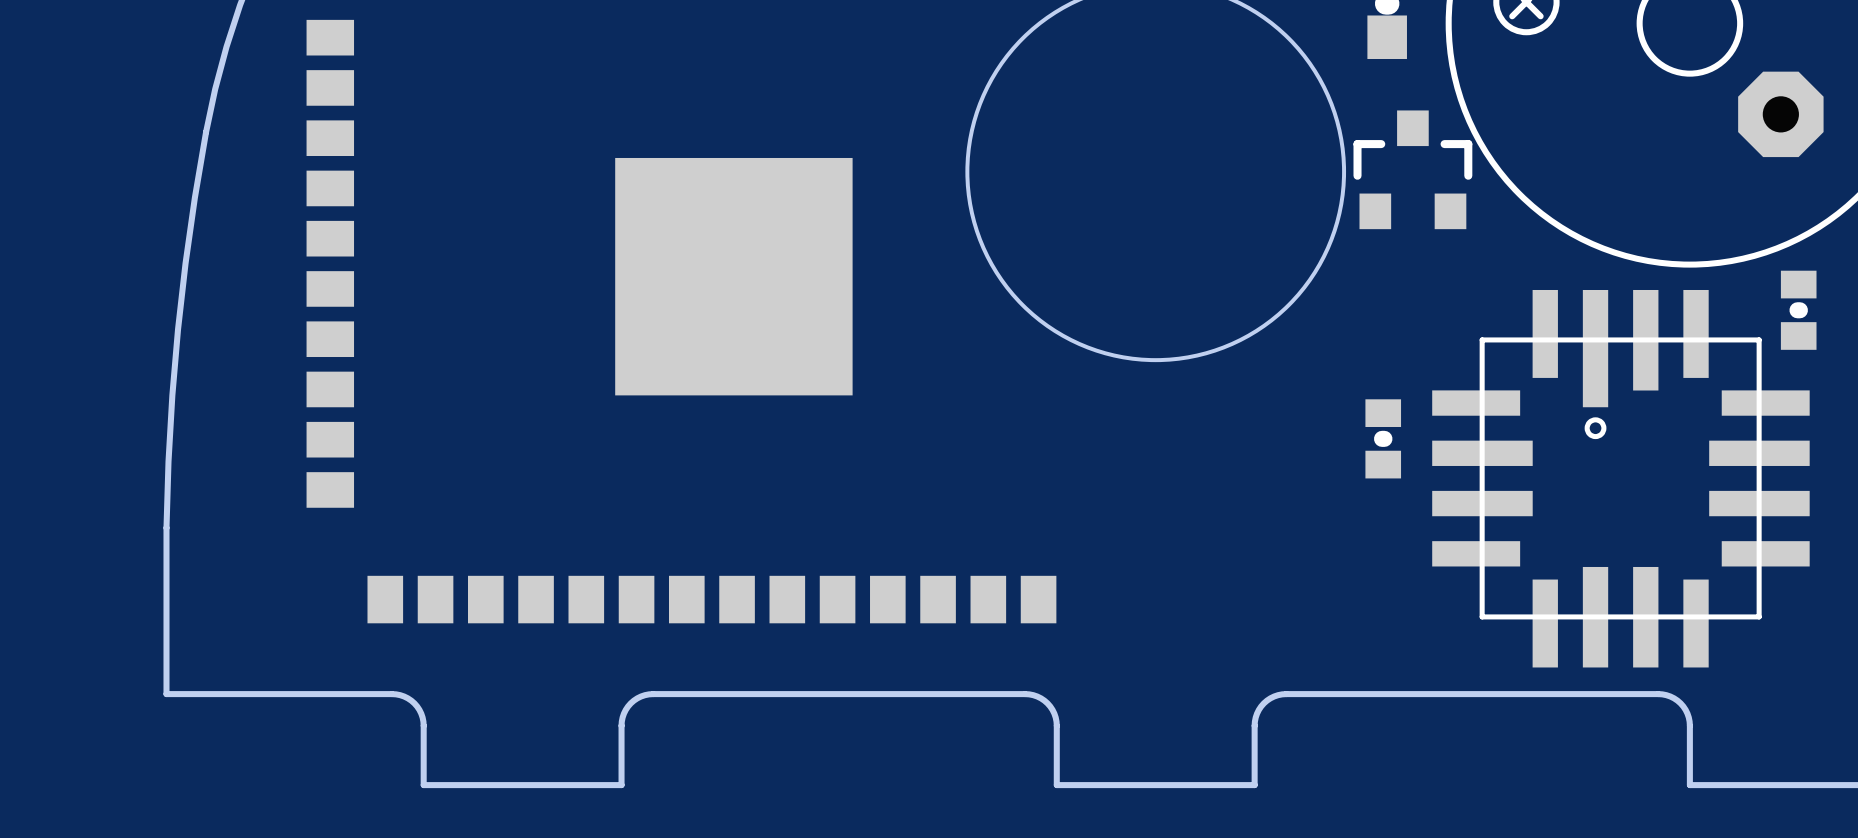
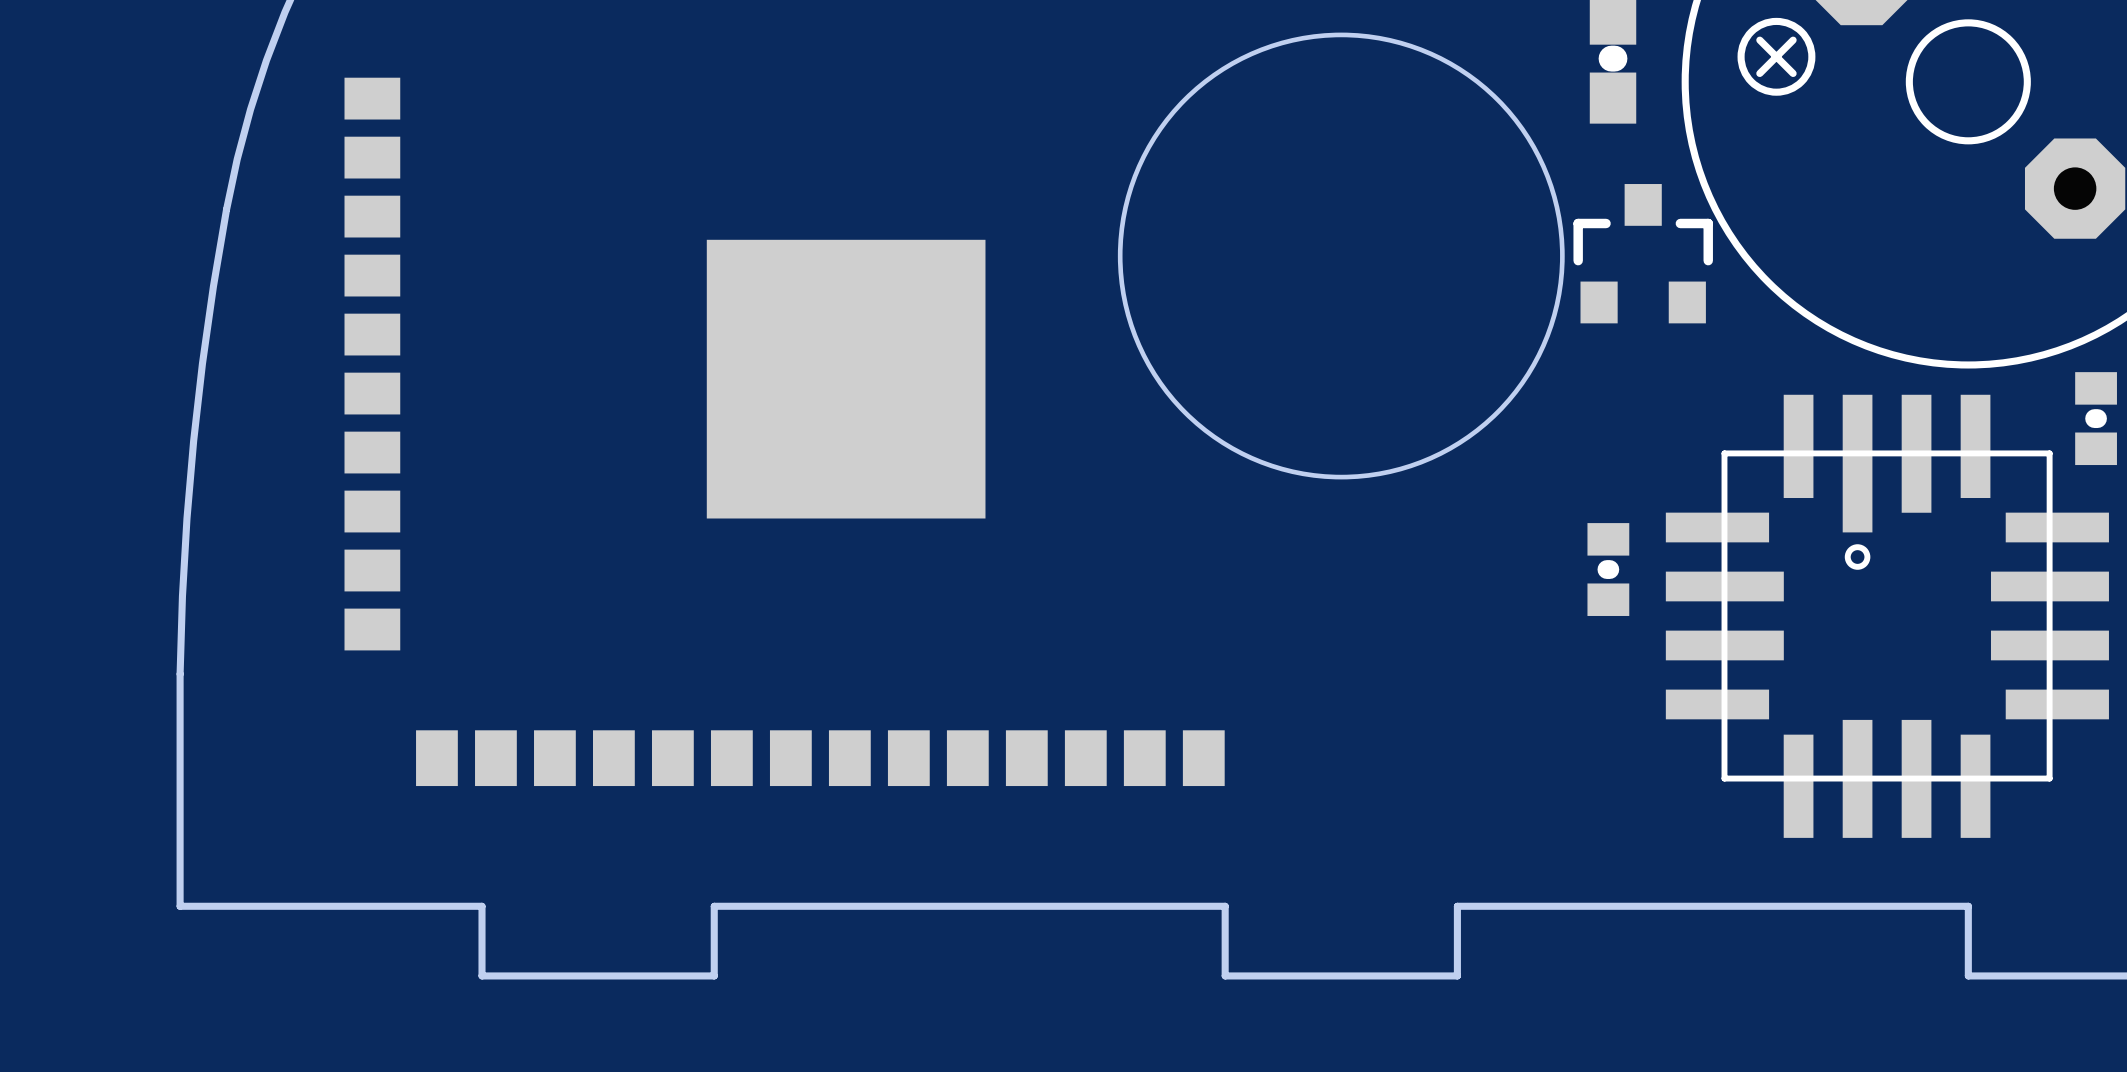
board edge: (166, 694) (396, 694) (407, 698) (414, 703) (421, 713) (423, 725) -> (180, 869) (180, 906) (482, 906)
board edge: (621, 725) (623, 713) (630, 703) (641, 696) (653, 694) (1029, 694) (1040, 698) (1047, 703) (1054, 713) (1056, 725) -> (714, 906) (1225, 906)
board edge: (1254, 725) (1257, 713) (1263, 703) (1274, 696) (1286, 694) (1662, 694) (1674, 698) (1680, 703) (1687, 713) (1689, 725) -> (1457, 906) (1968, 906)

